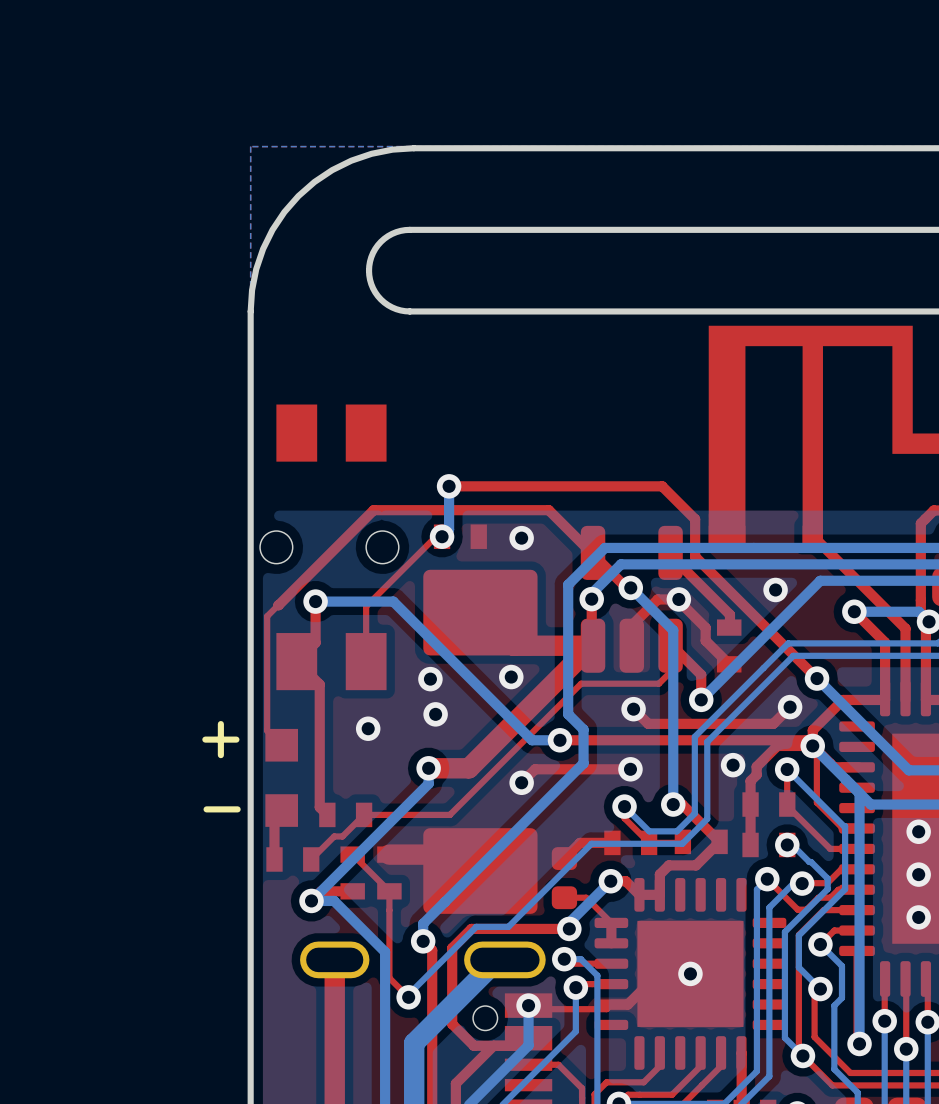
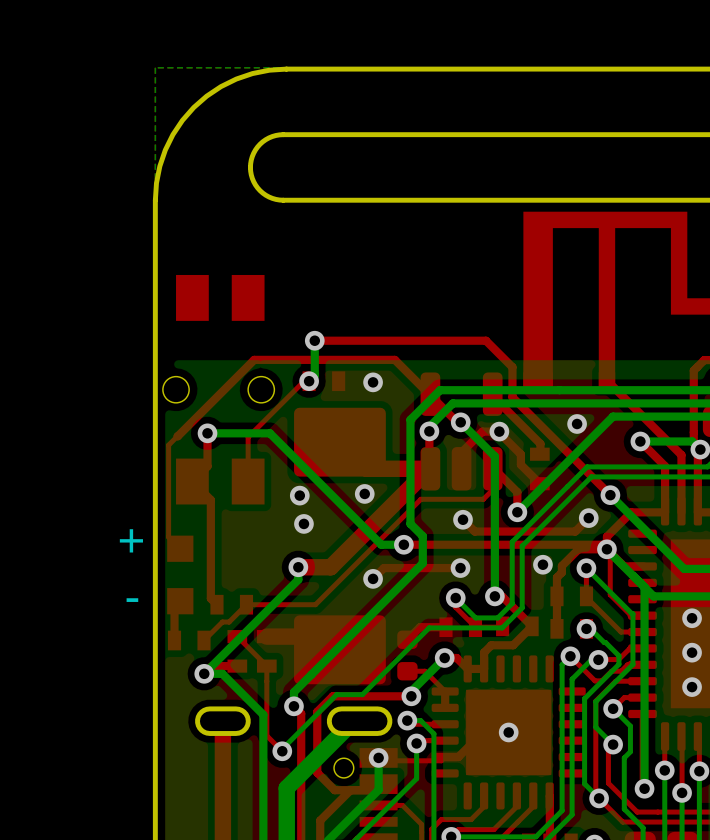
via: (368, 728) -> none

